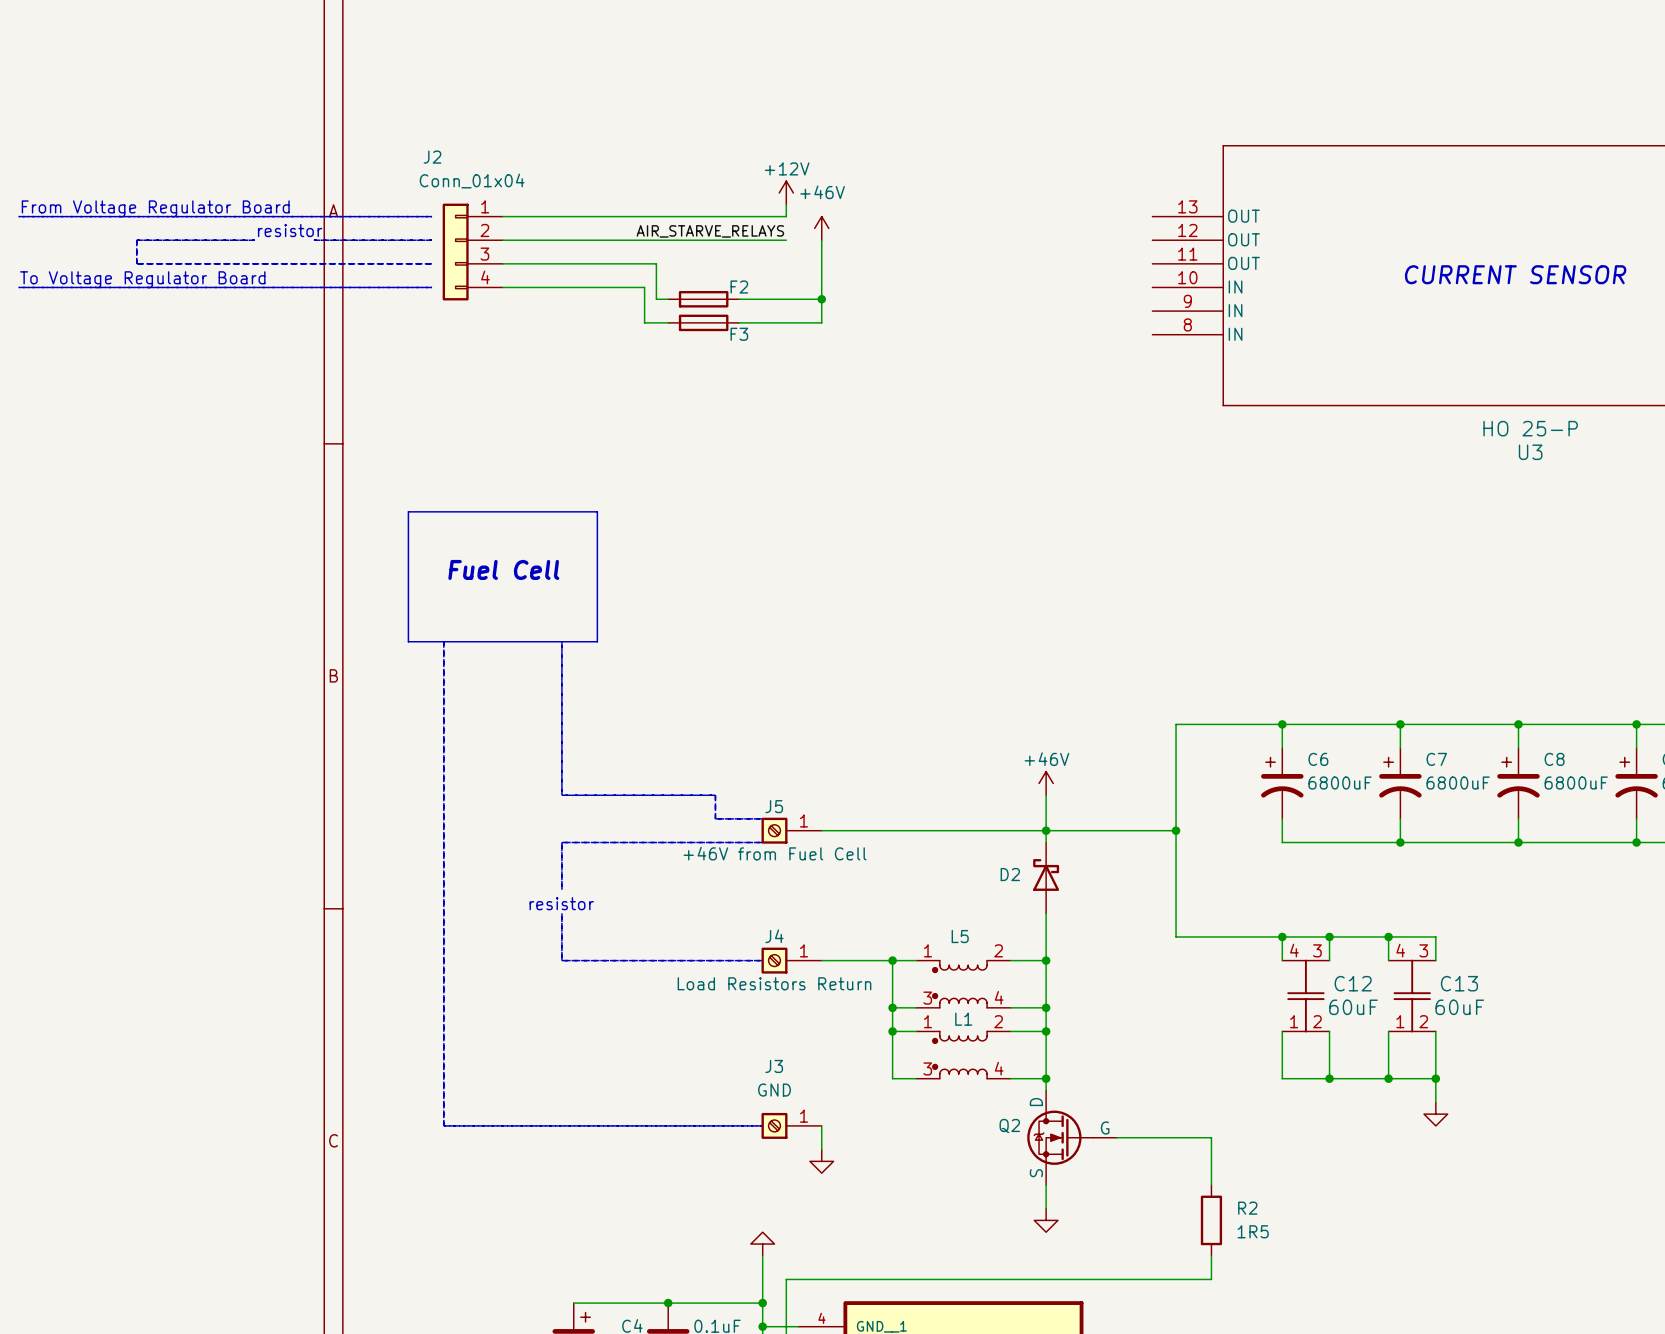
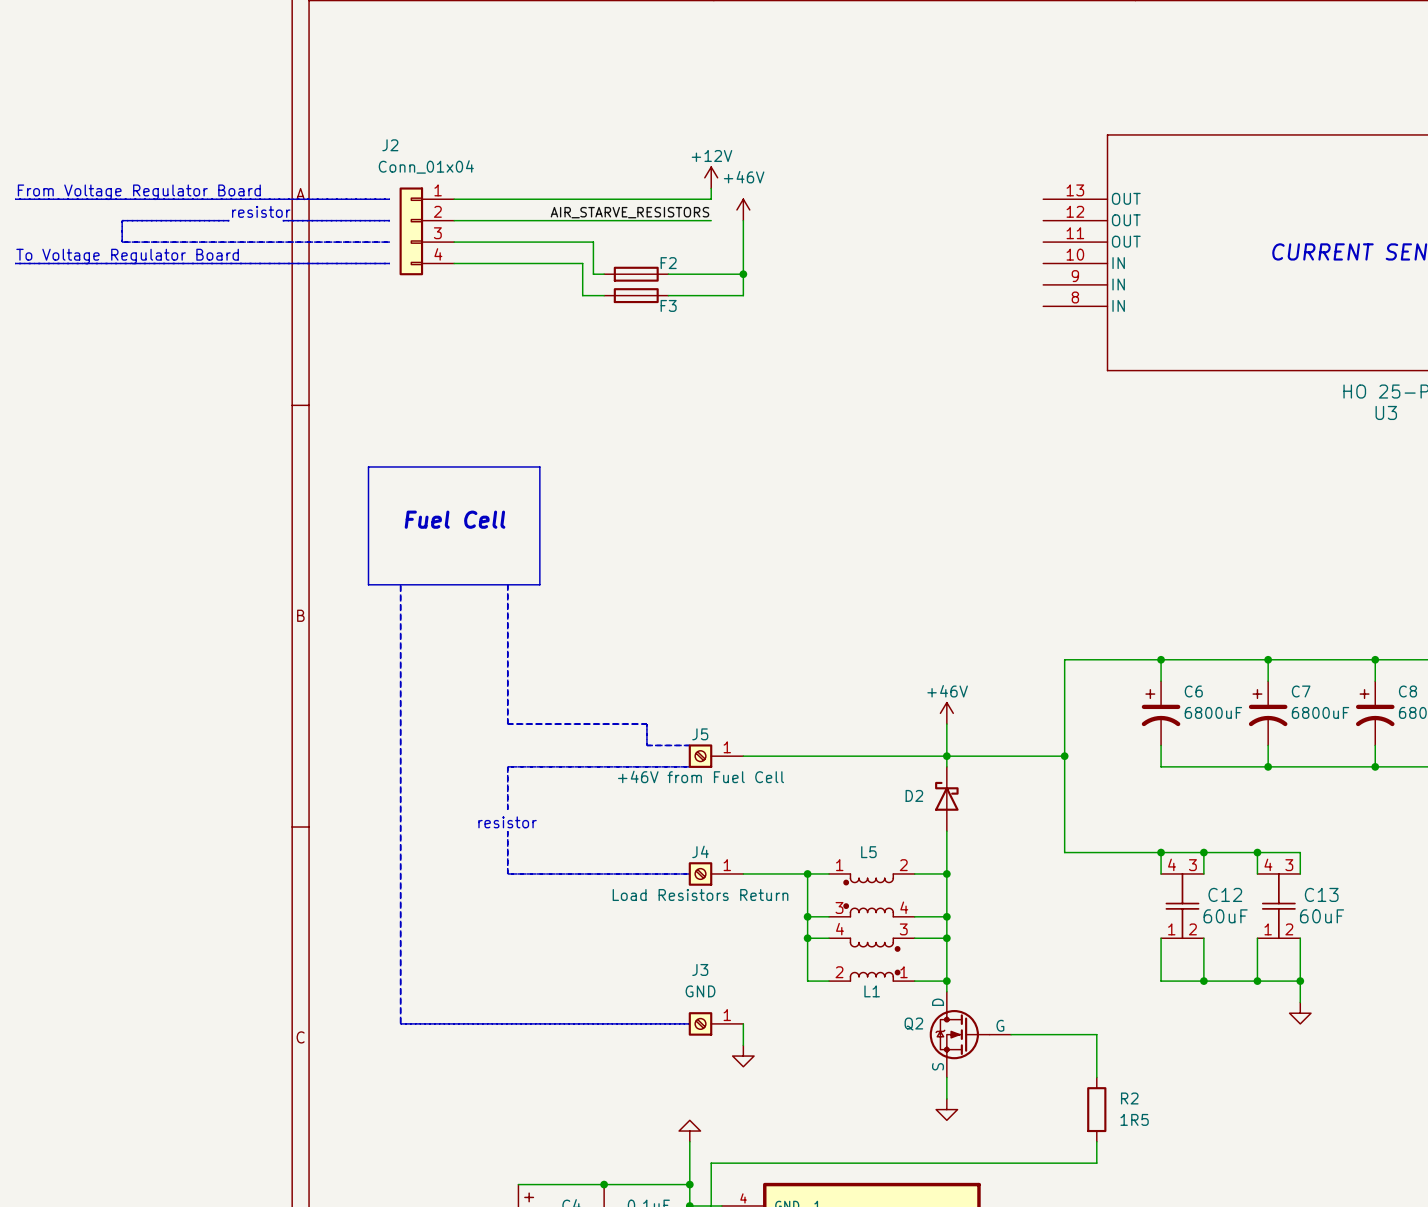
label: AIR_STARVE_RELAYS (710, 231) -> AIR_STARVE_RESISTORS (629, 212)
L1 rotation: 0° (959, 1055) -> 180° (875, 959)

